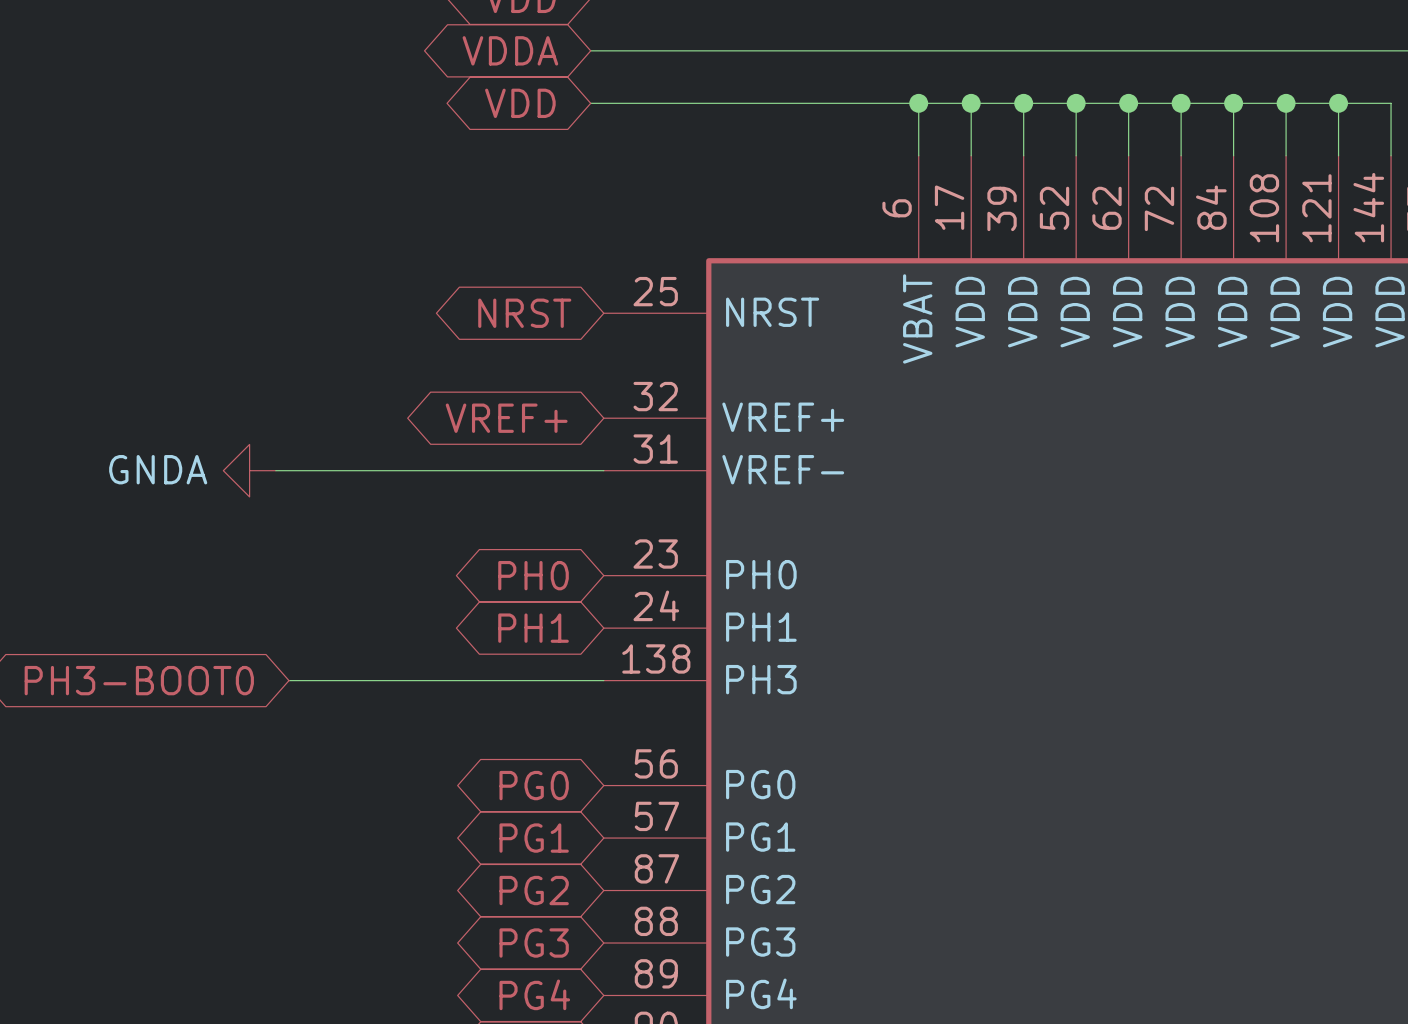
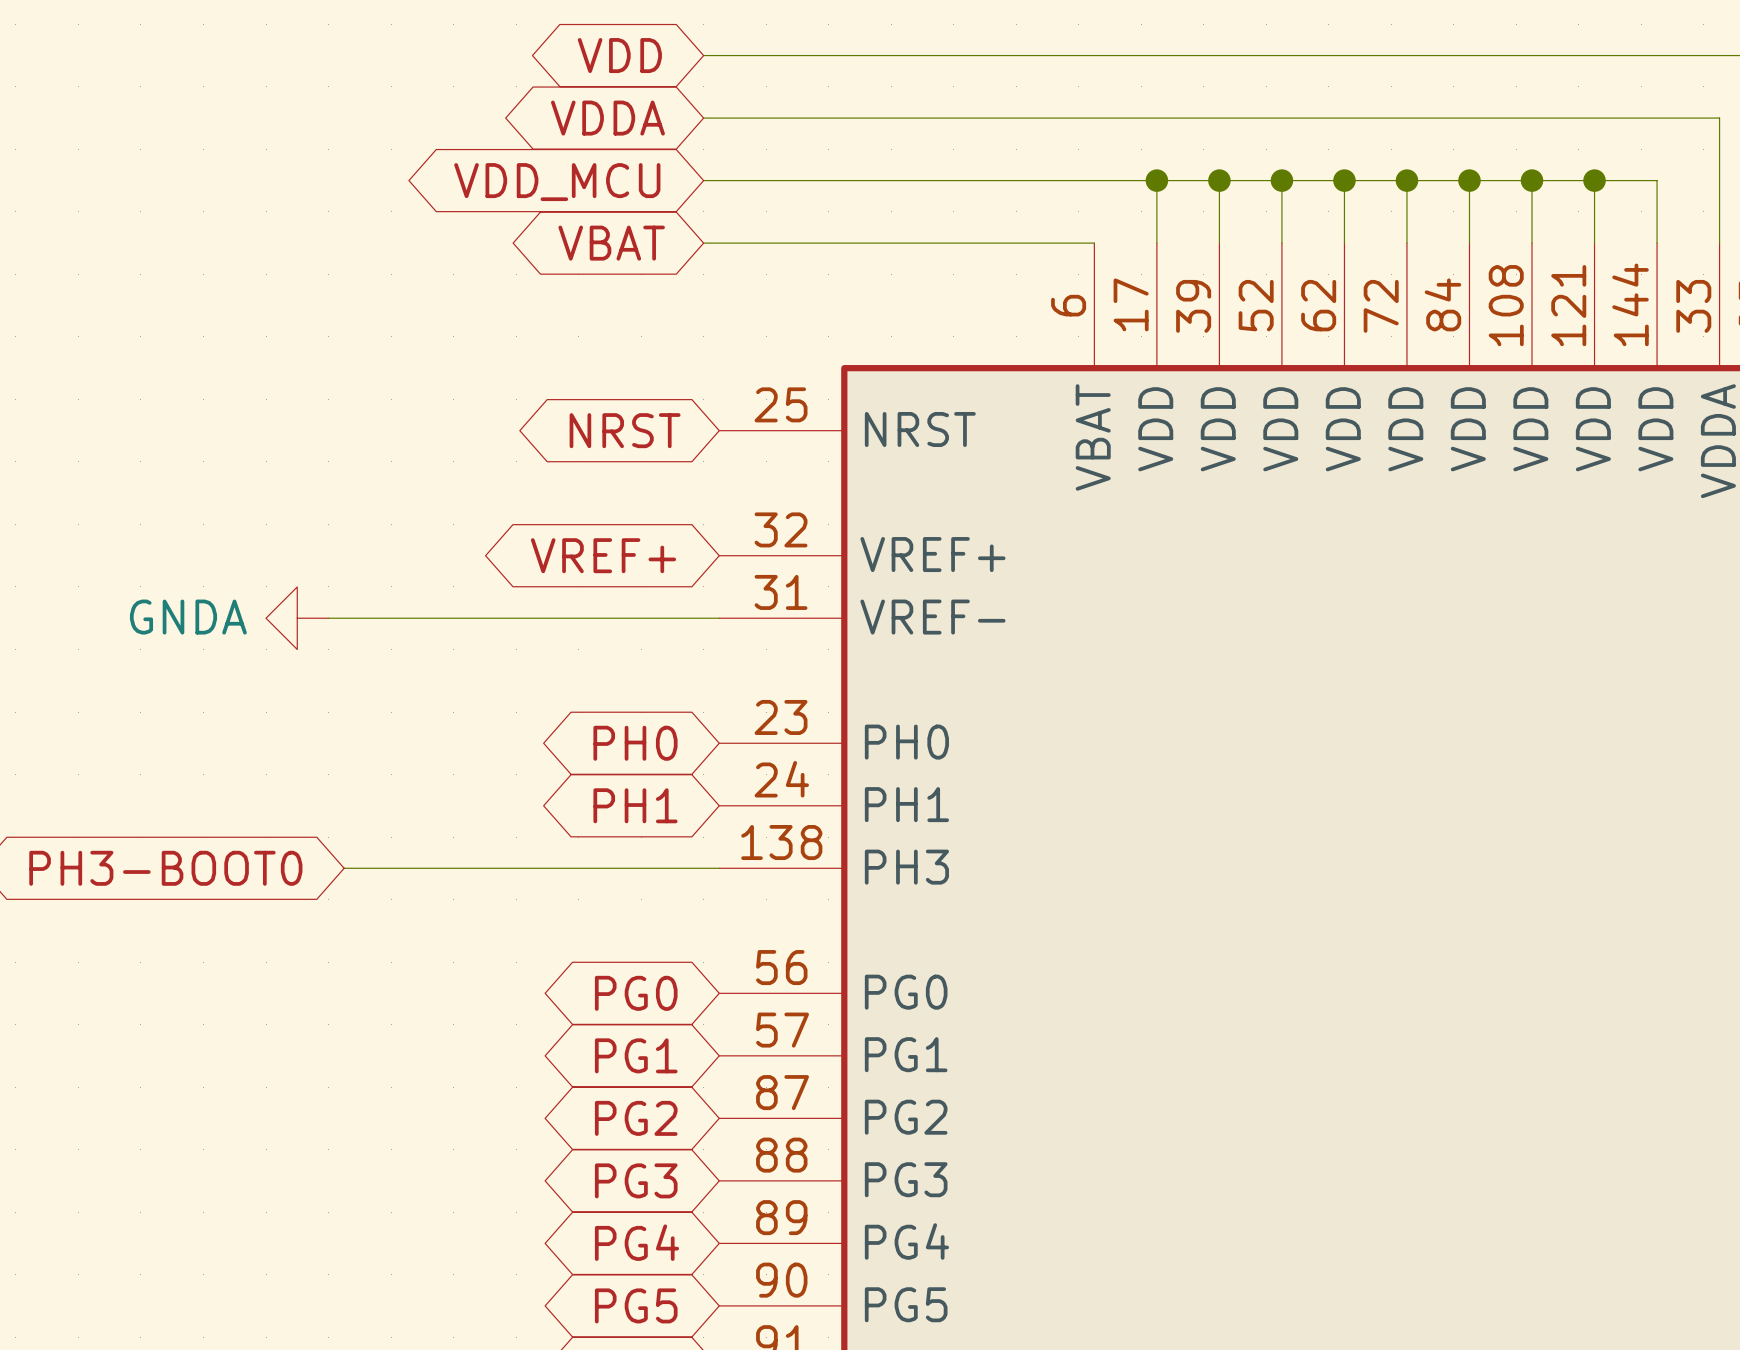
global label: VDD (520, 103) -> VDD_MCU (557, 182)
wire: (918, 103) (918, 155) -> (703, 243) (1094, 243)
junction: (918, 103) -> none
global label: none -> VBAT (611, 243)

